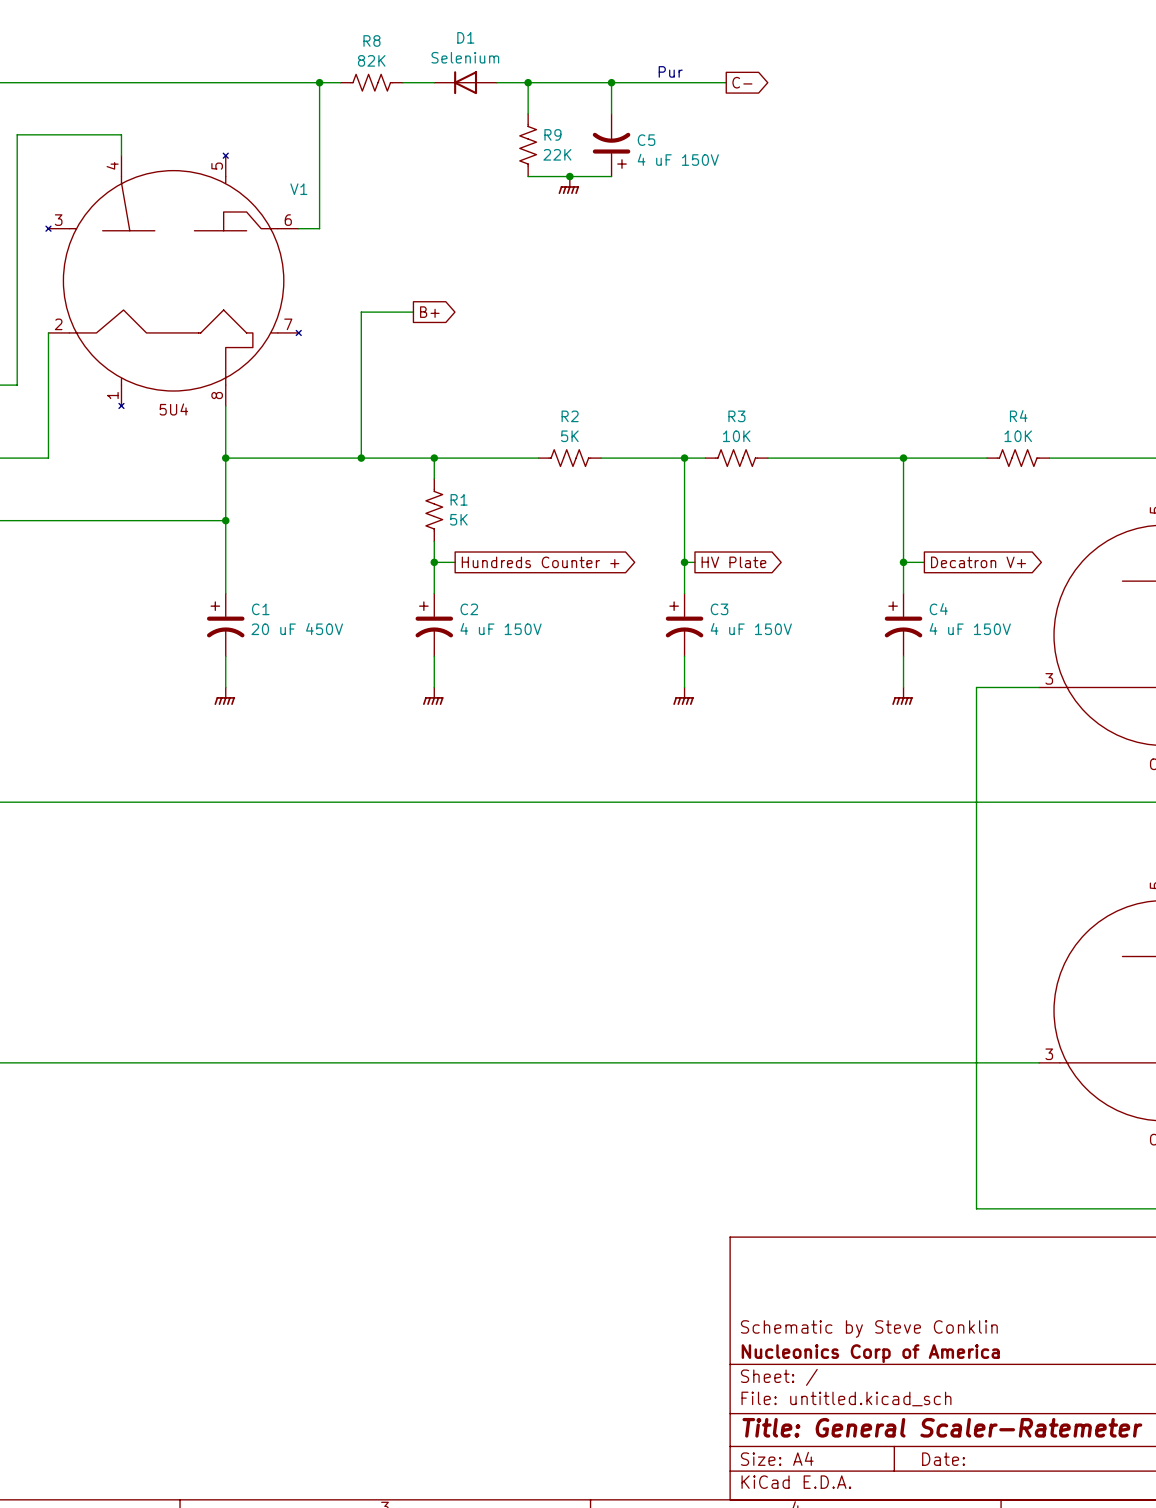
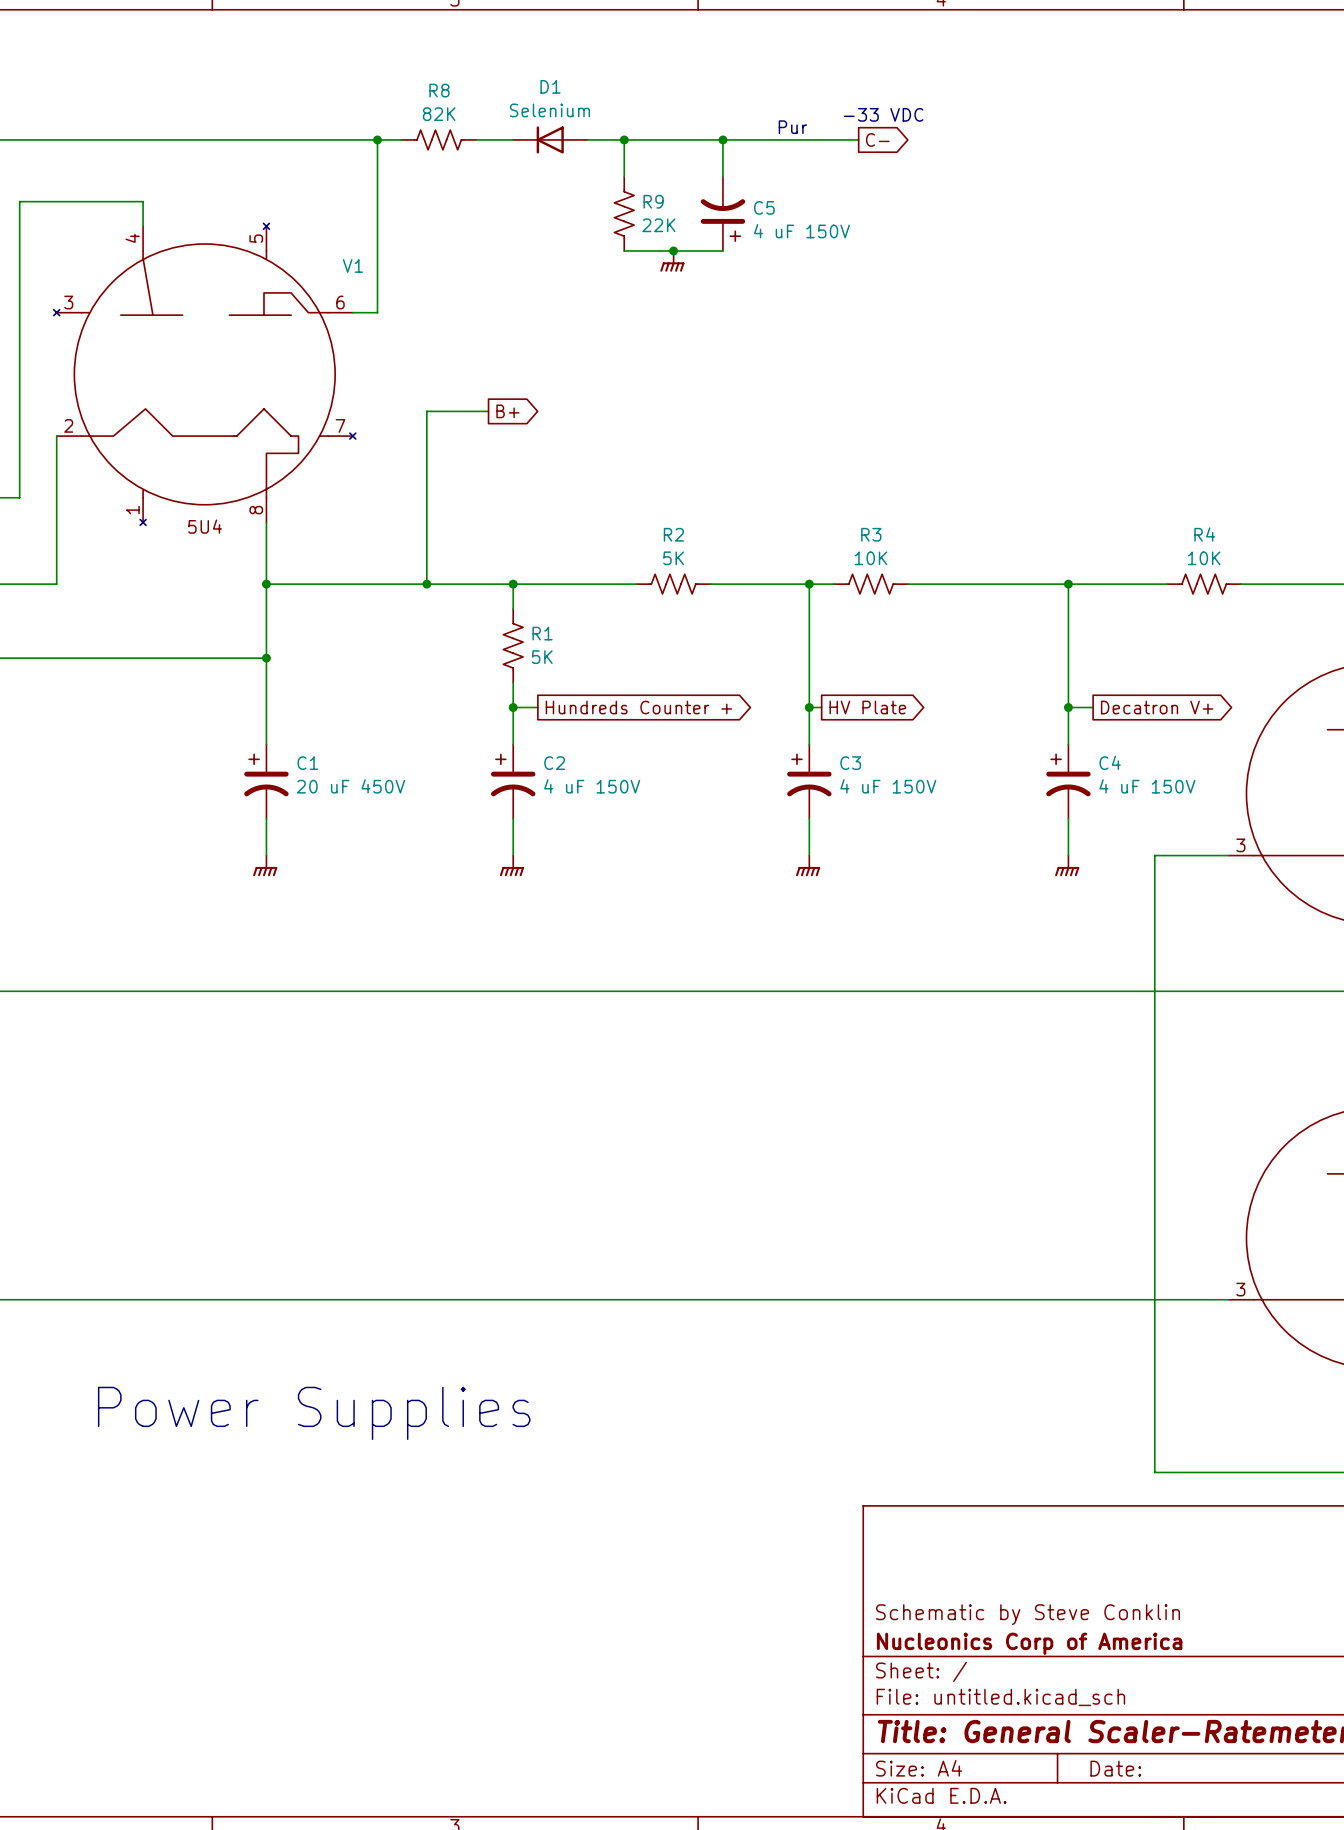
text: none -> -33 VDC (883, 114)
text: none -> Power Supplies (314, 1413)

